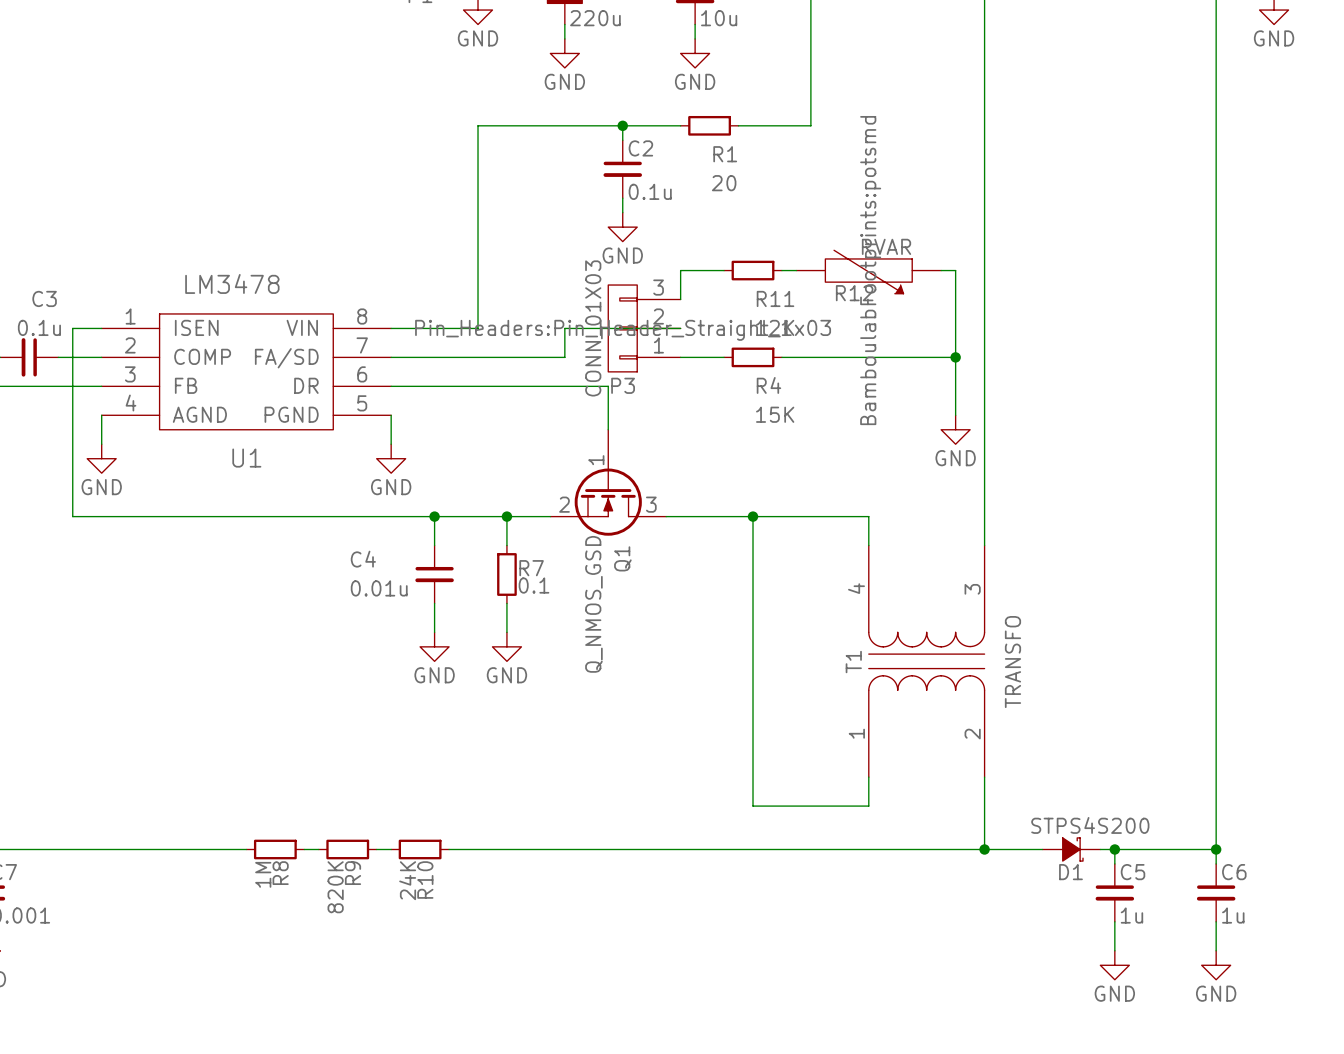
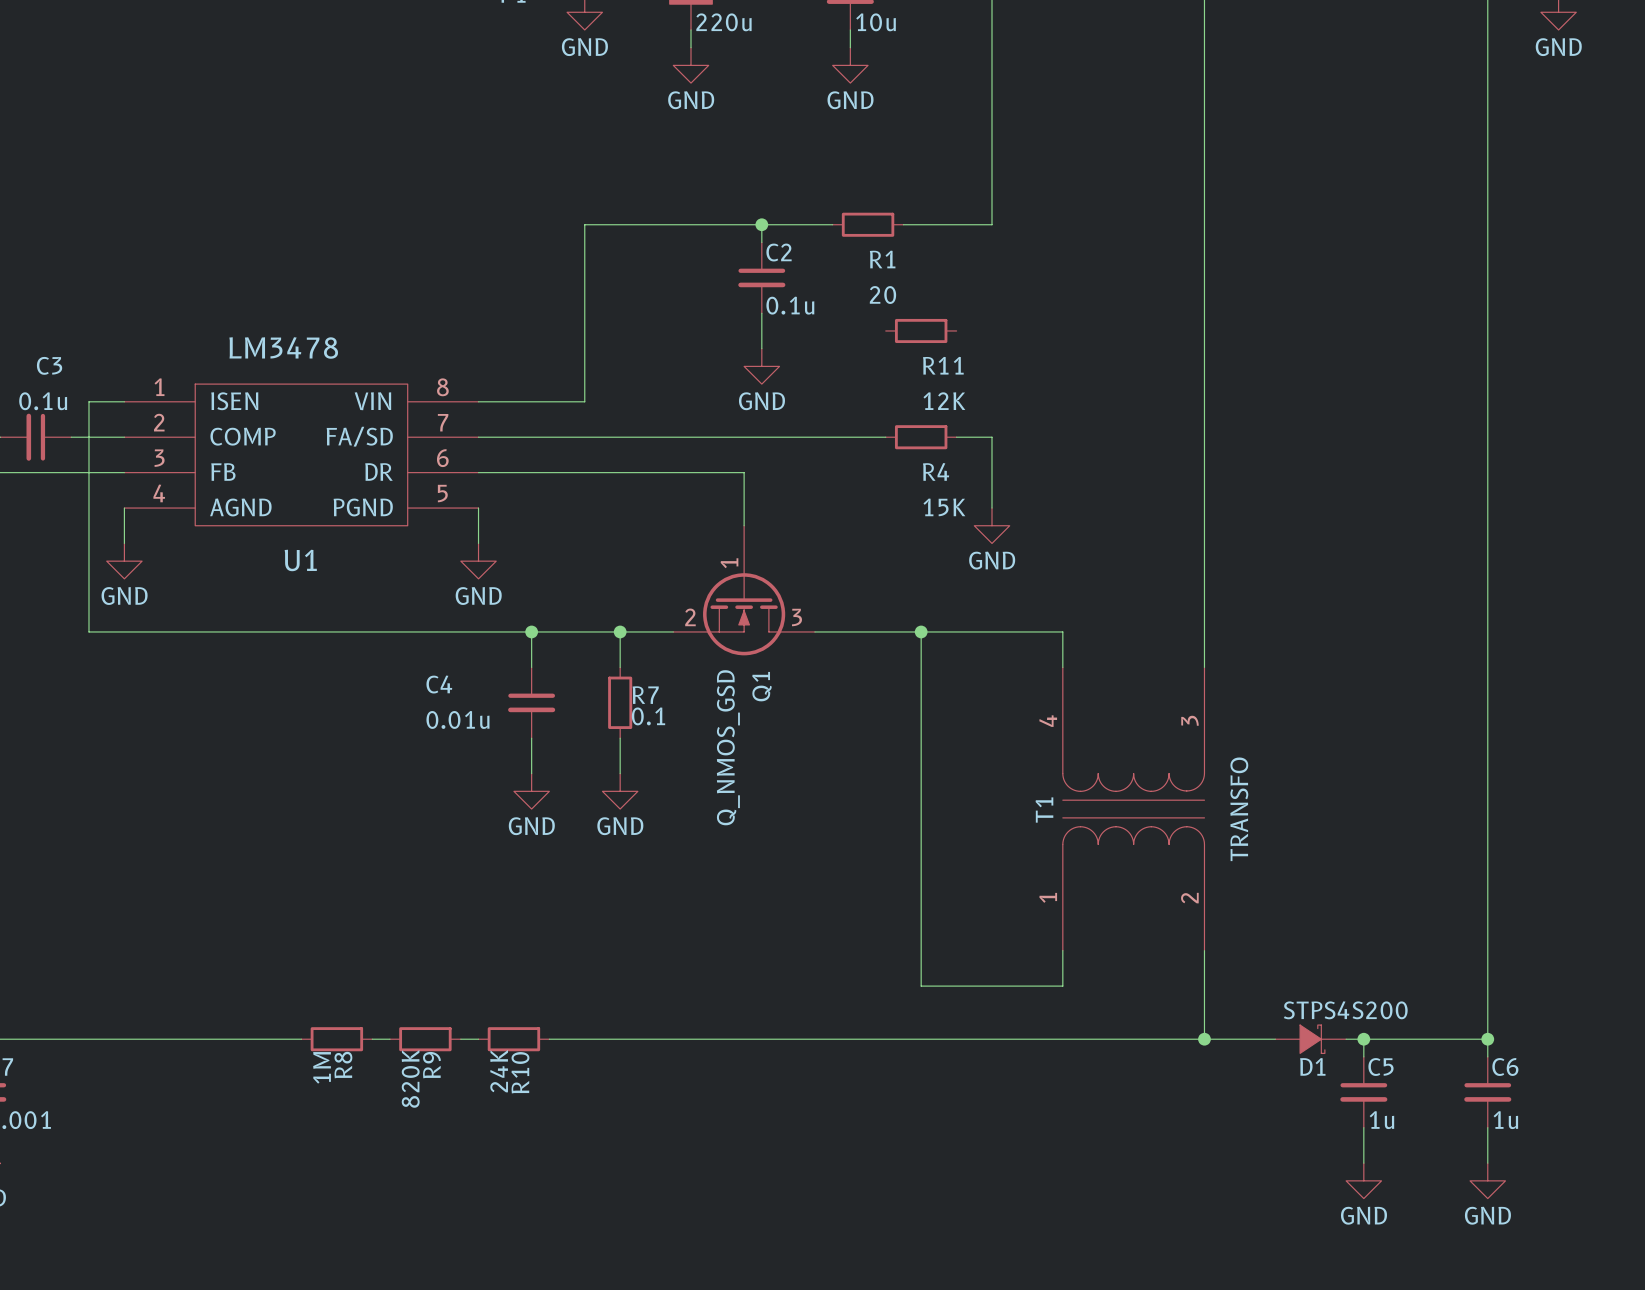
wire: (622, 125) (622, 140) -> none
junction position: (622, 125) -> (761, 224)
wire: (680, 125) (478, 125) (478, 183) -> (832, 224) (584, 224)
R1 position: (709, 125) -> (868, 224)
wire: (738, 125) (810, 125) -> (903, 224) (992, 224) (992, 153)
C2 position: (622, 169) -> (761, 277)
power symbol position: GND (622, 227) -> GND (761, 366)
wire: none -> (761, 313) (761, 348)
wire: (724, 270) (680, 270) (680, 299) -> none
wire: (781, 270) (796, 270) -> none
wire: (941, 270) (955, 270) (955, 415) -> none
R12: RVAR (868, 272) -> none
P3: CONN_01X03 (644, 328) -> none
wire: (680, 328) (564, 328) (564, 357) -> (832, 437) (691, 437)
wire: (810, 357) (955, 357) -> (992, 437) (992, 508)
junction: (955, 357) -> none
power symbol: none -> GND (992, 525)
power symbol: GND (955, 429) -> none

